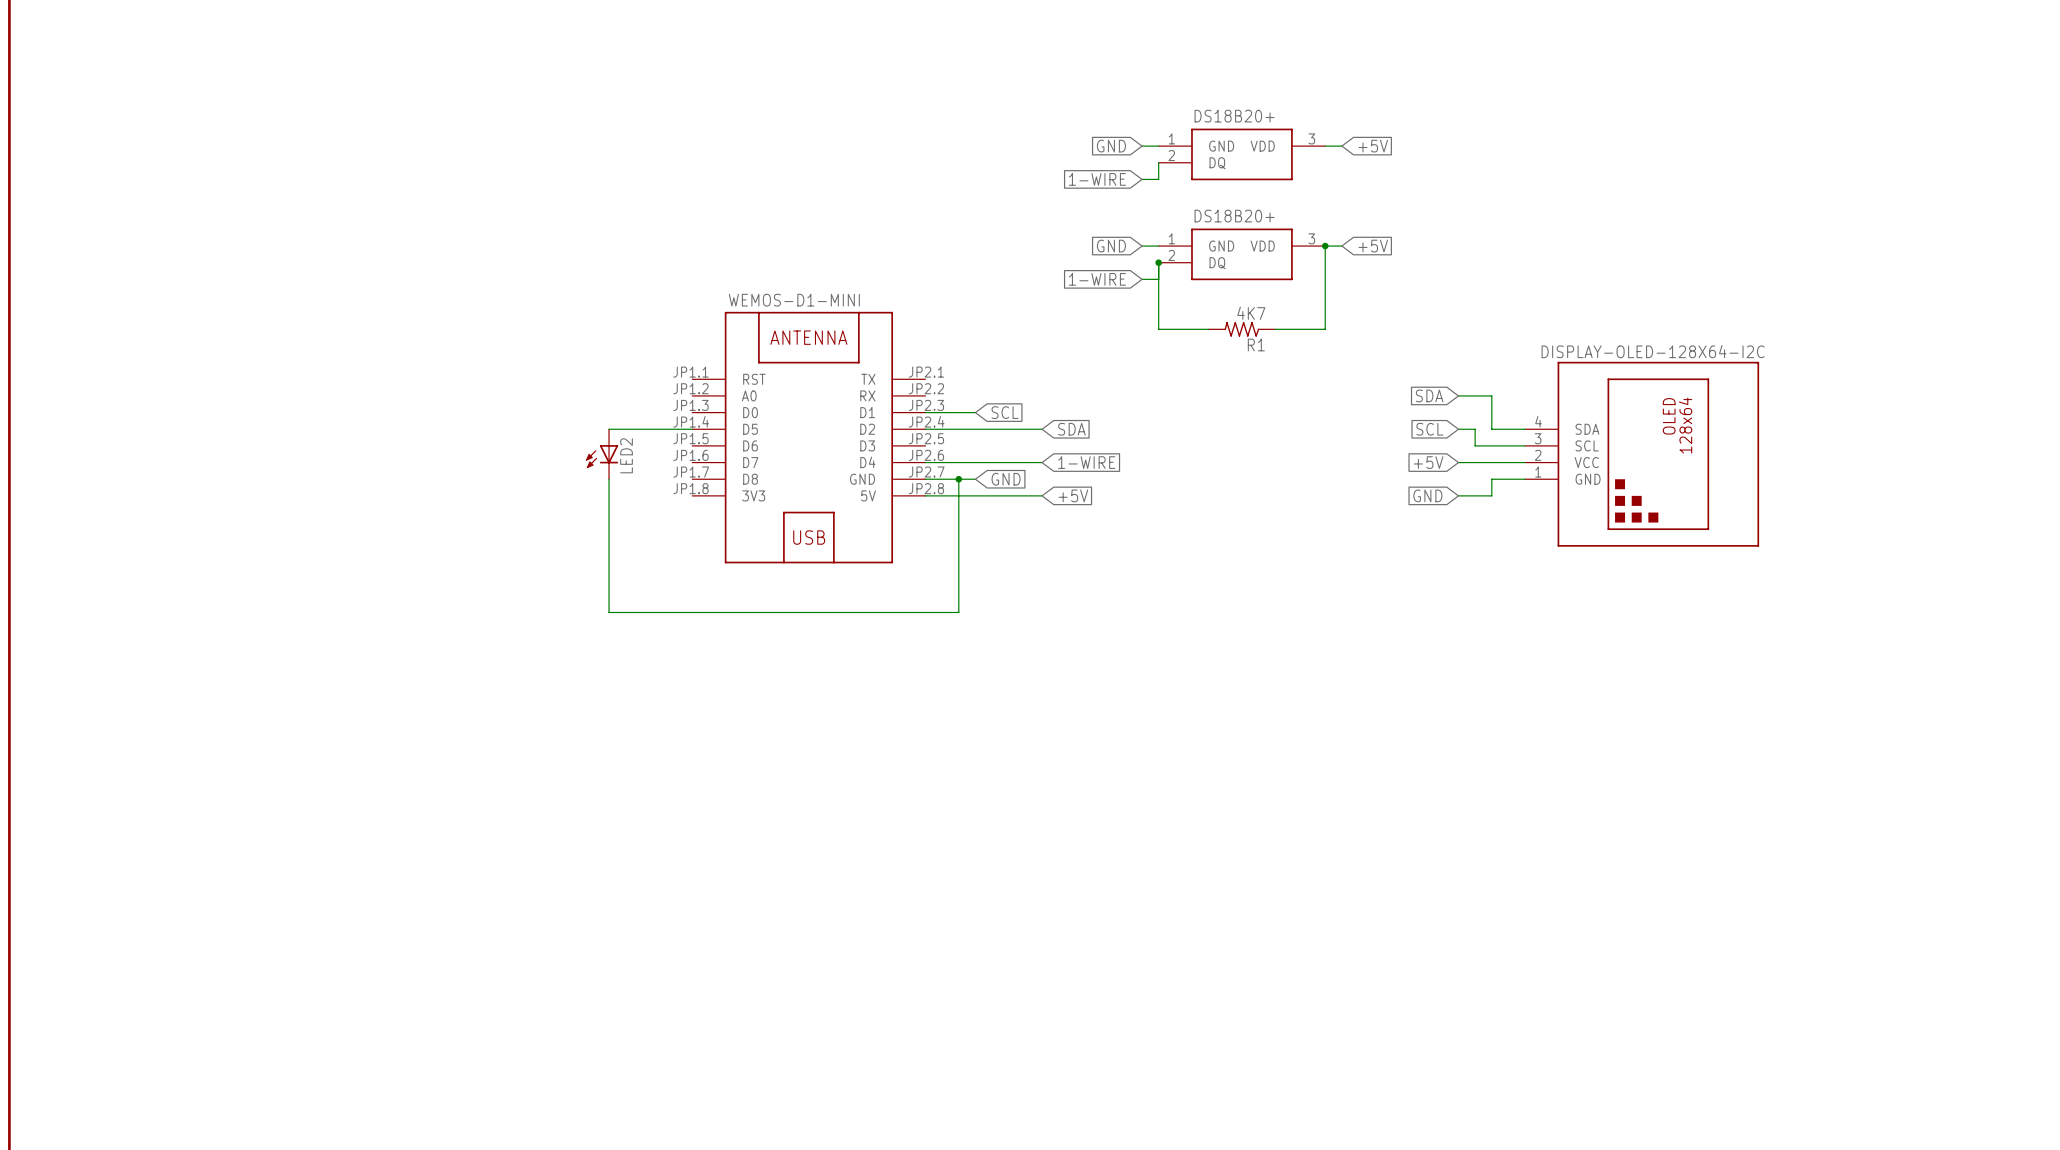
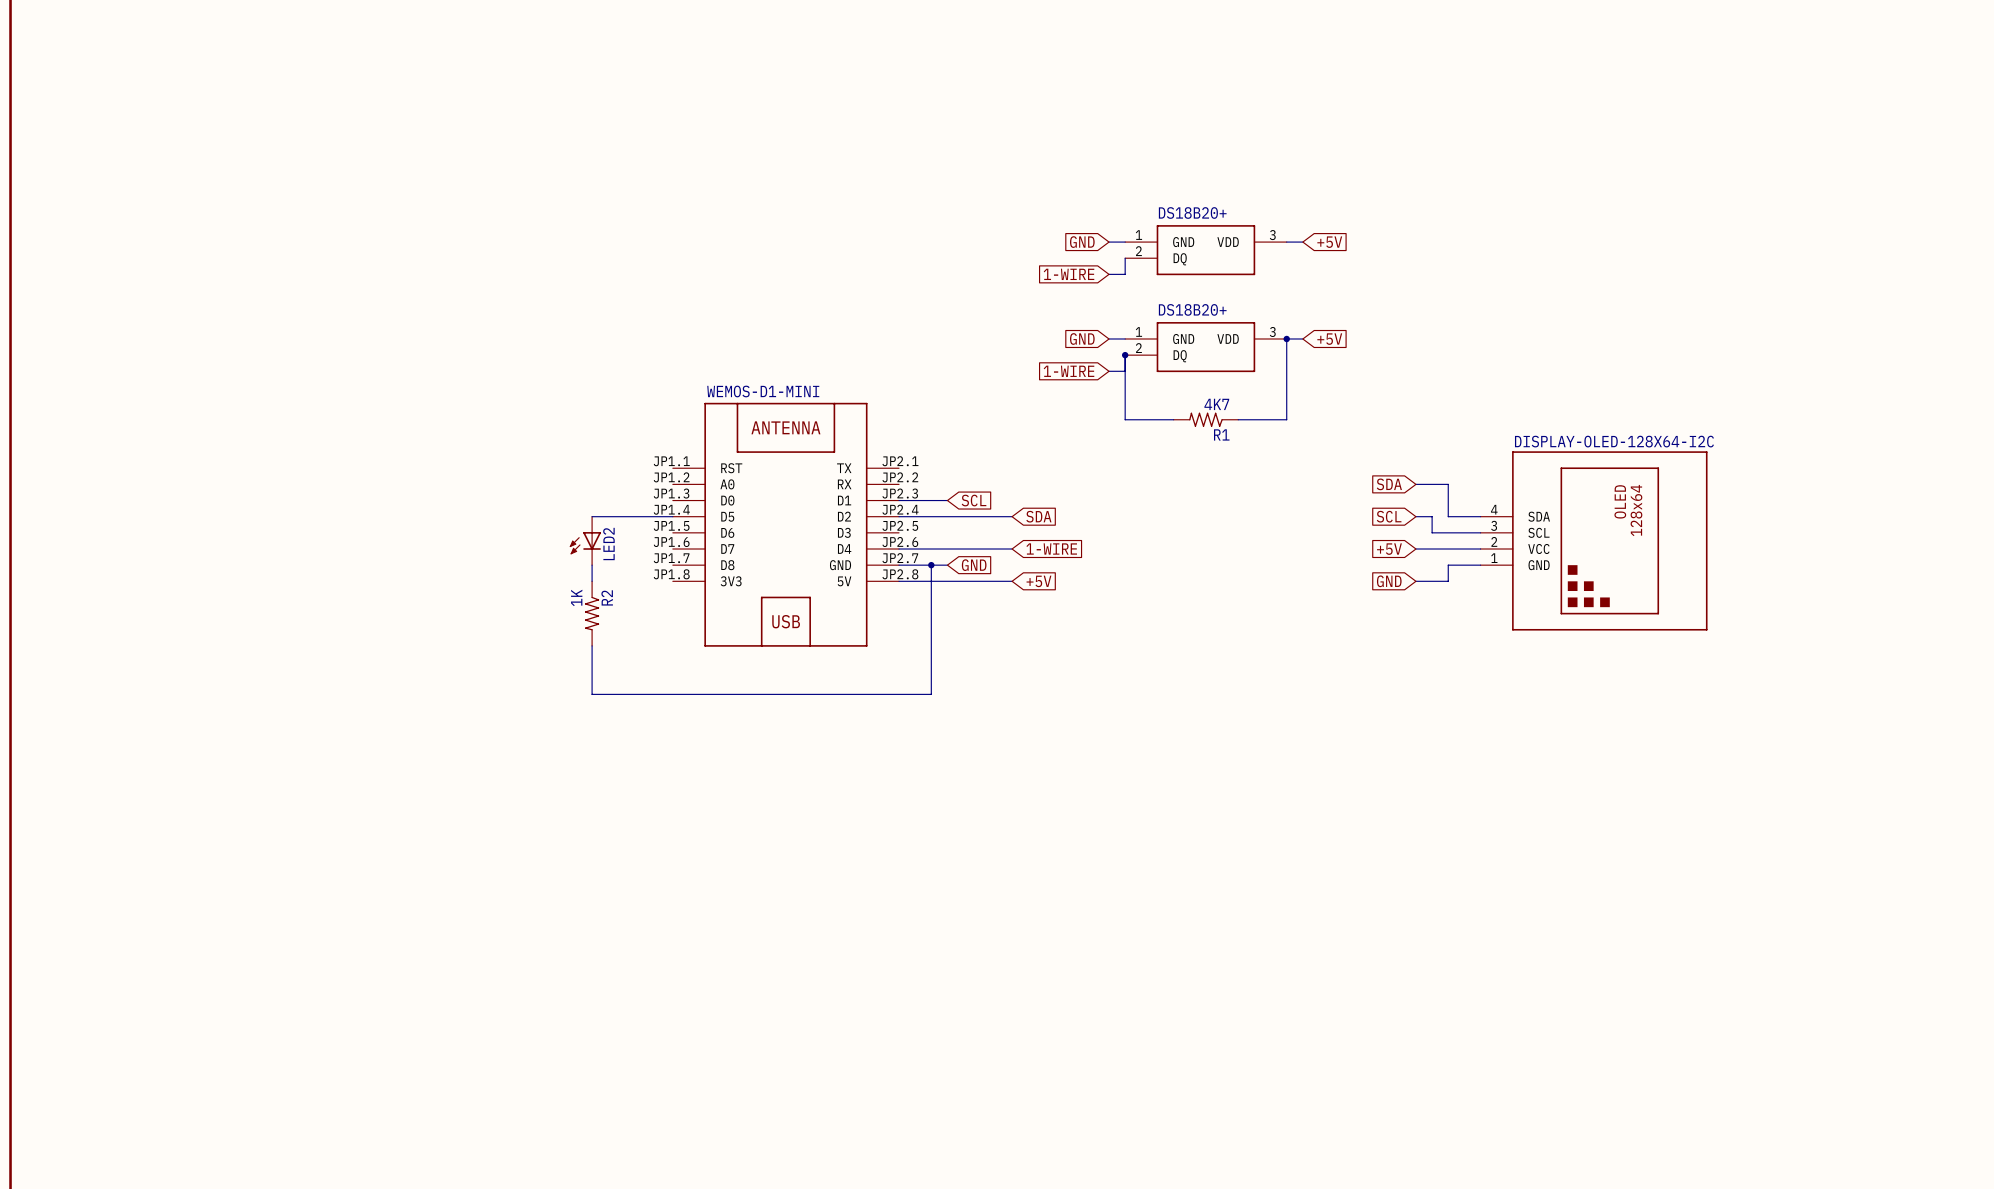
R2: none -> 1K (592, 613)

